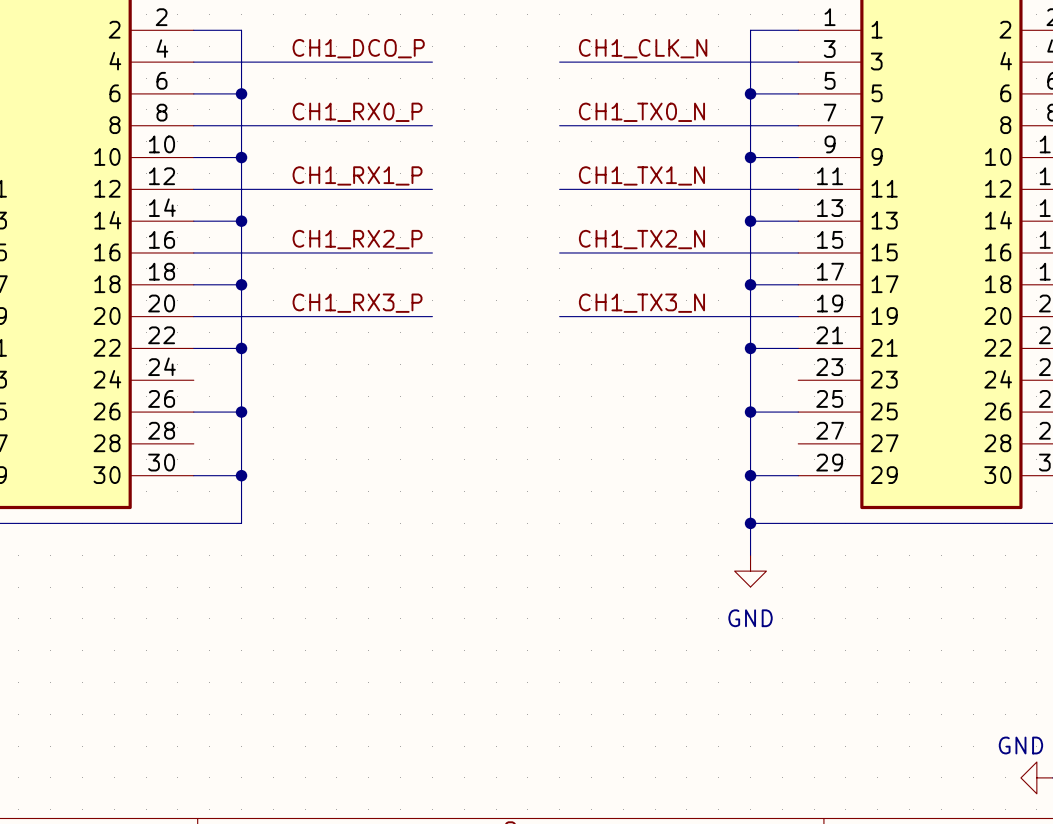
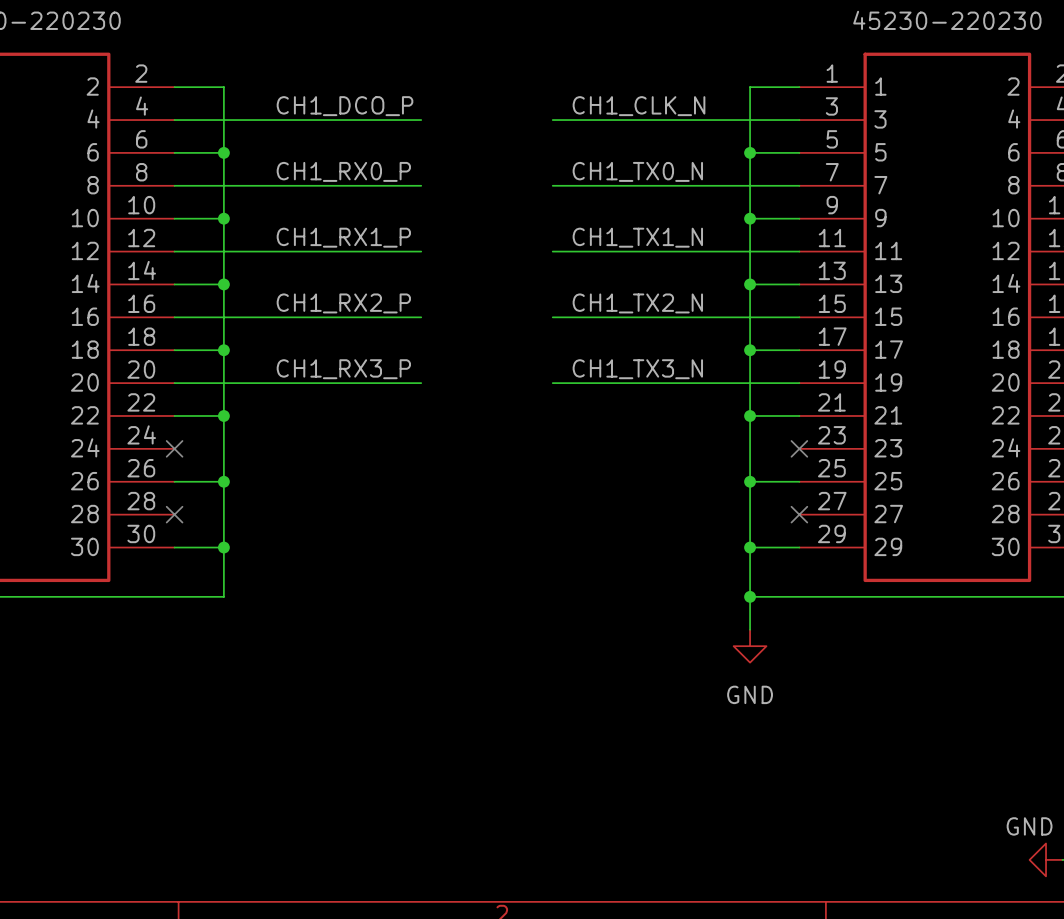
no-connect mark: none -> (174, 448)
no-connect mark: none -> (799, 448)
no-connect mark: none -> (174, 514)
no-connect mark: none -> (799, 514)

